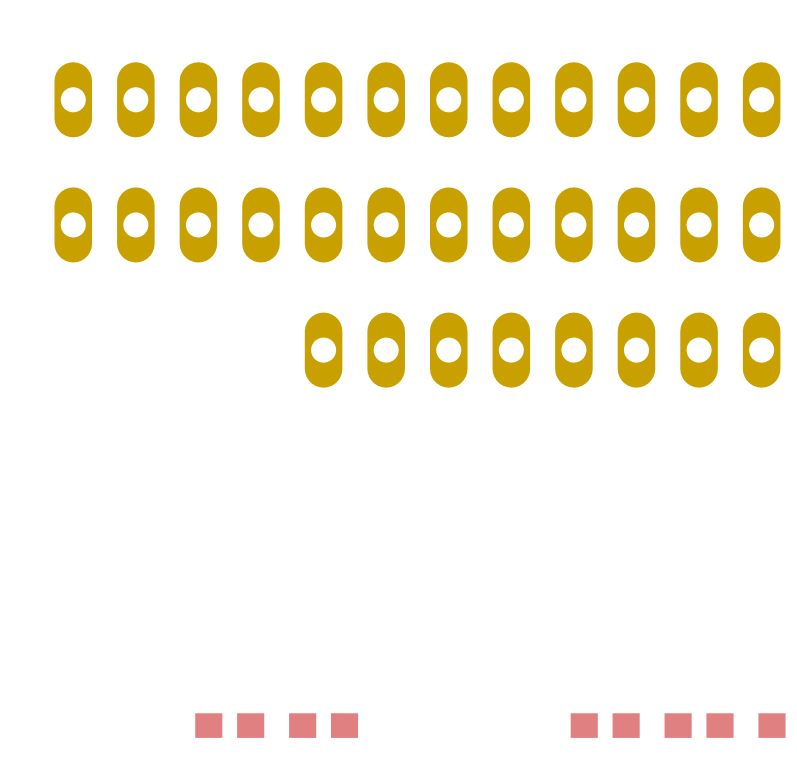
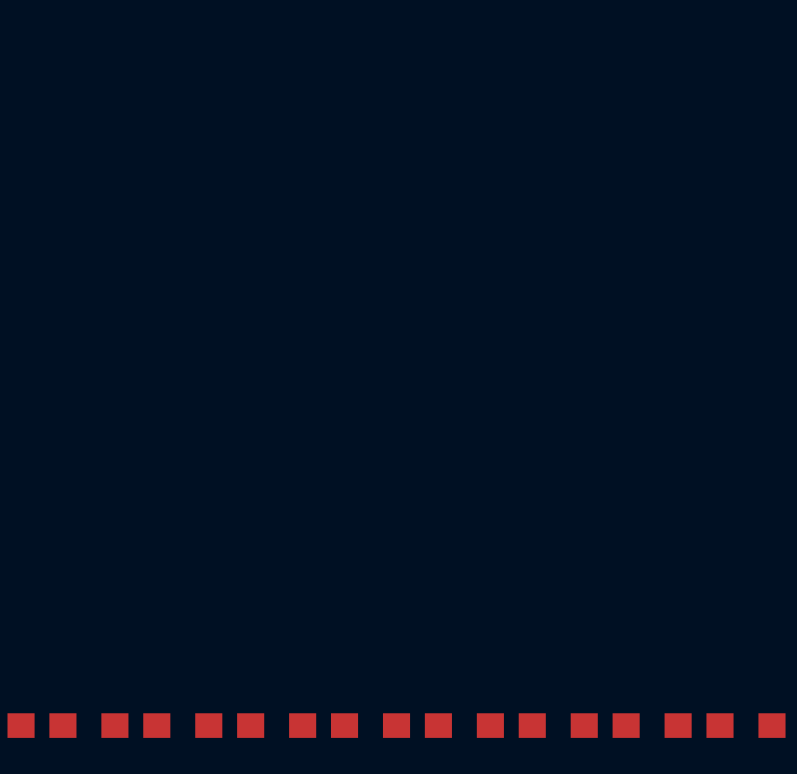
part: (417, 99) -> none
part: (417, 224) -> none
part: (542, 350) -> none
part: none -> (41, 725)
part: none -> (135, 725)
part: none -> (417, 725)
part: none -> (511, 725)

